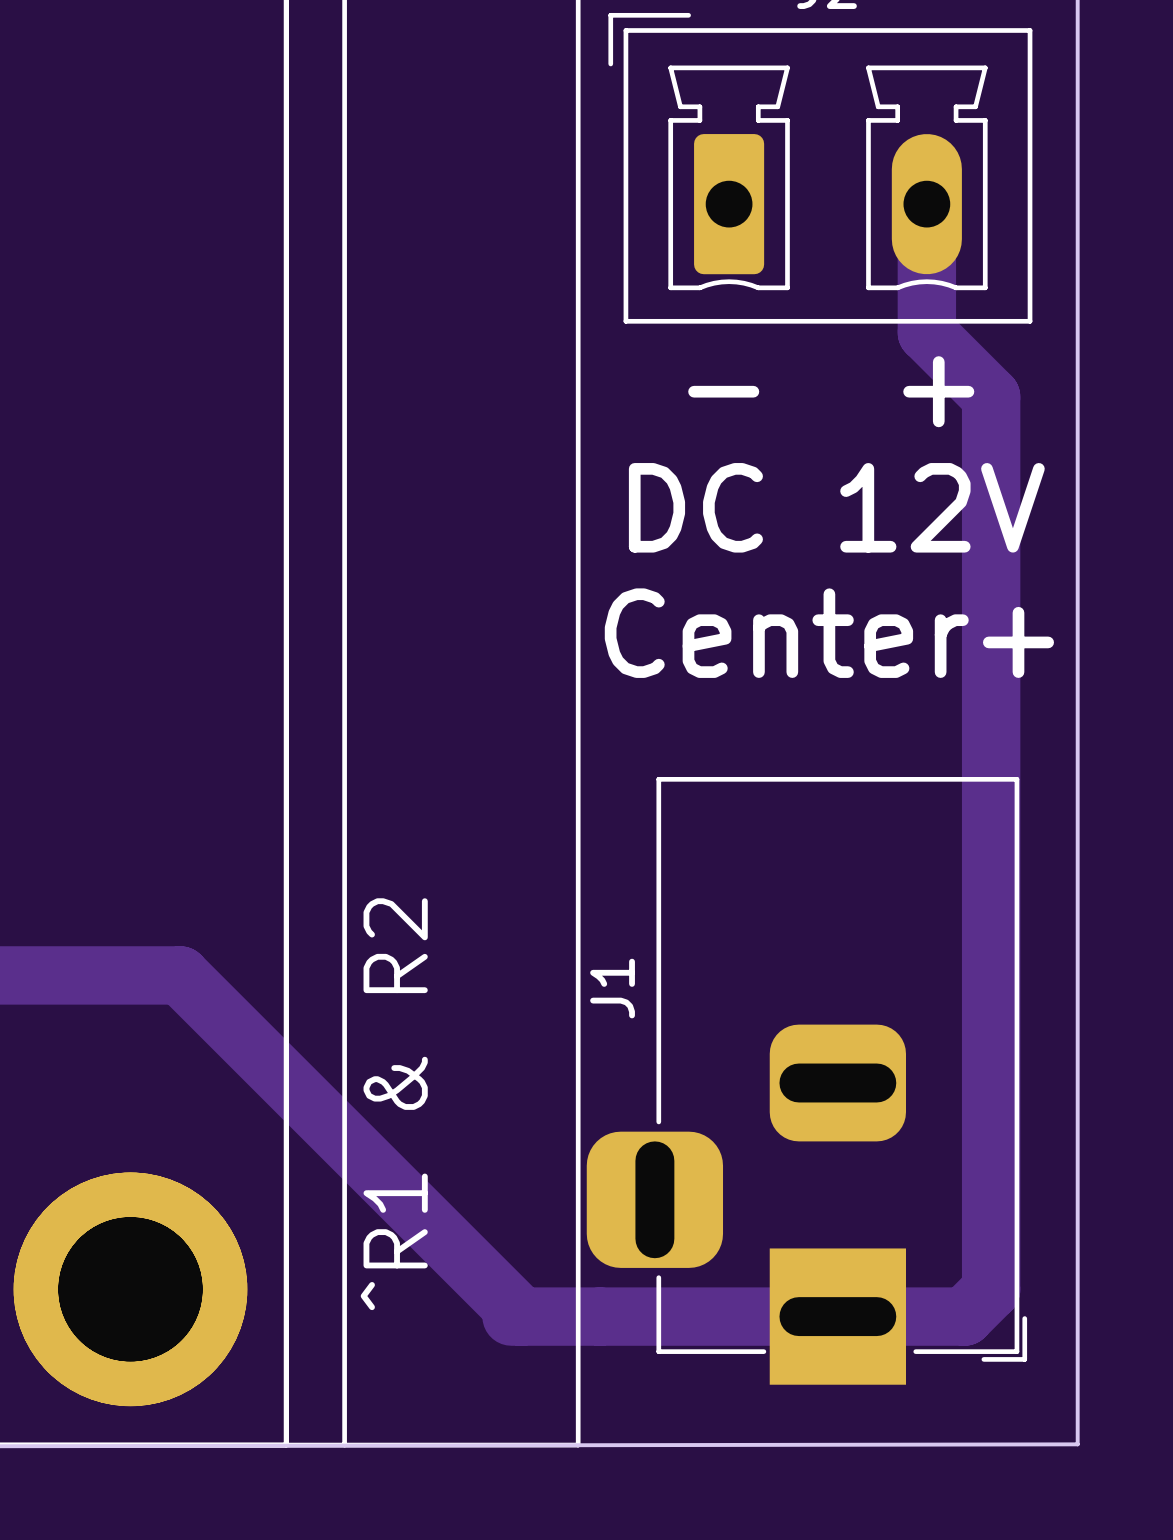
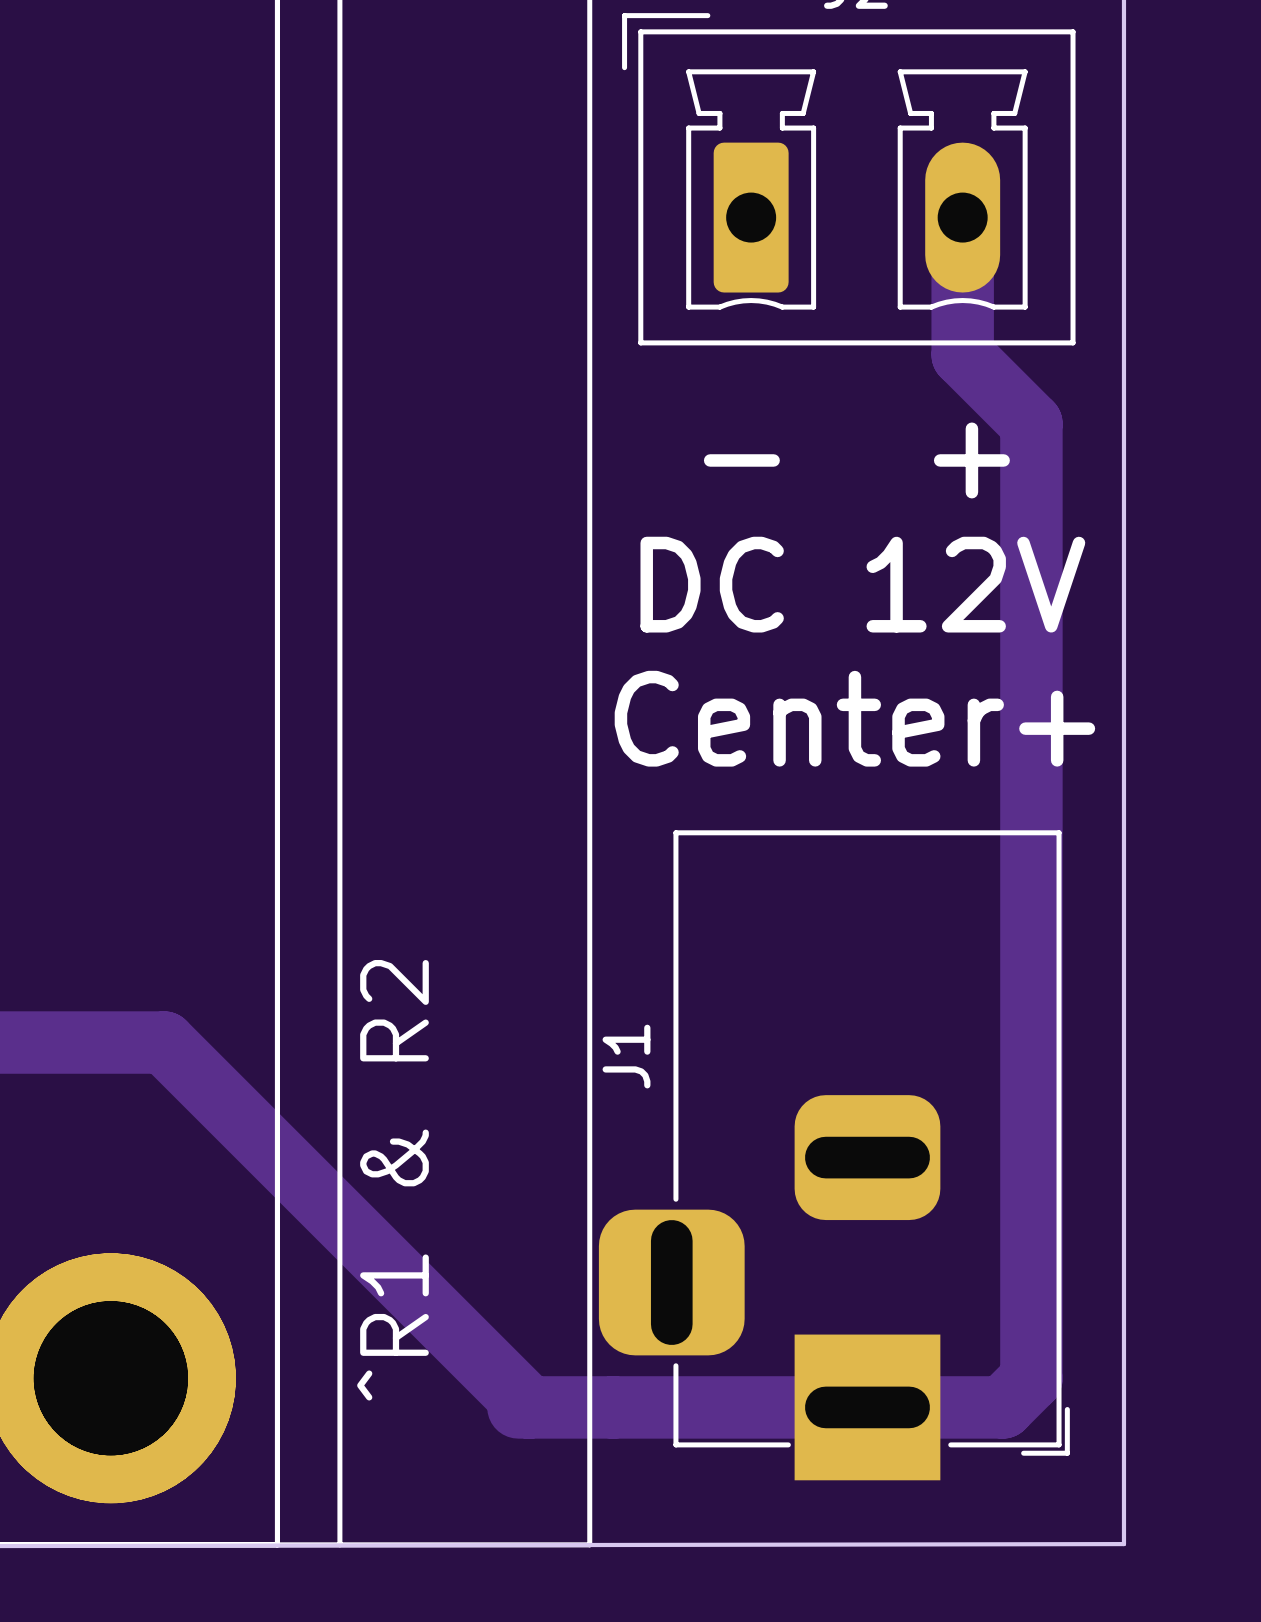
text position: - + (831, 391) -> - + (856, 460)
text position: DC 12V (836, 507) -> DC 12V (862, 584)
text position: Center+ (829, 633) -> Center+ (854, 718)

